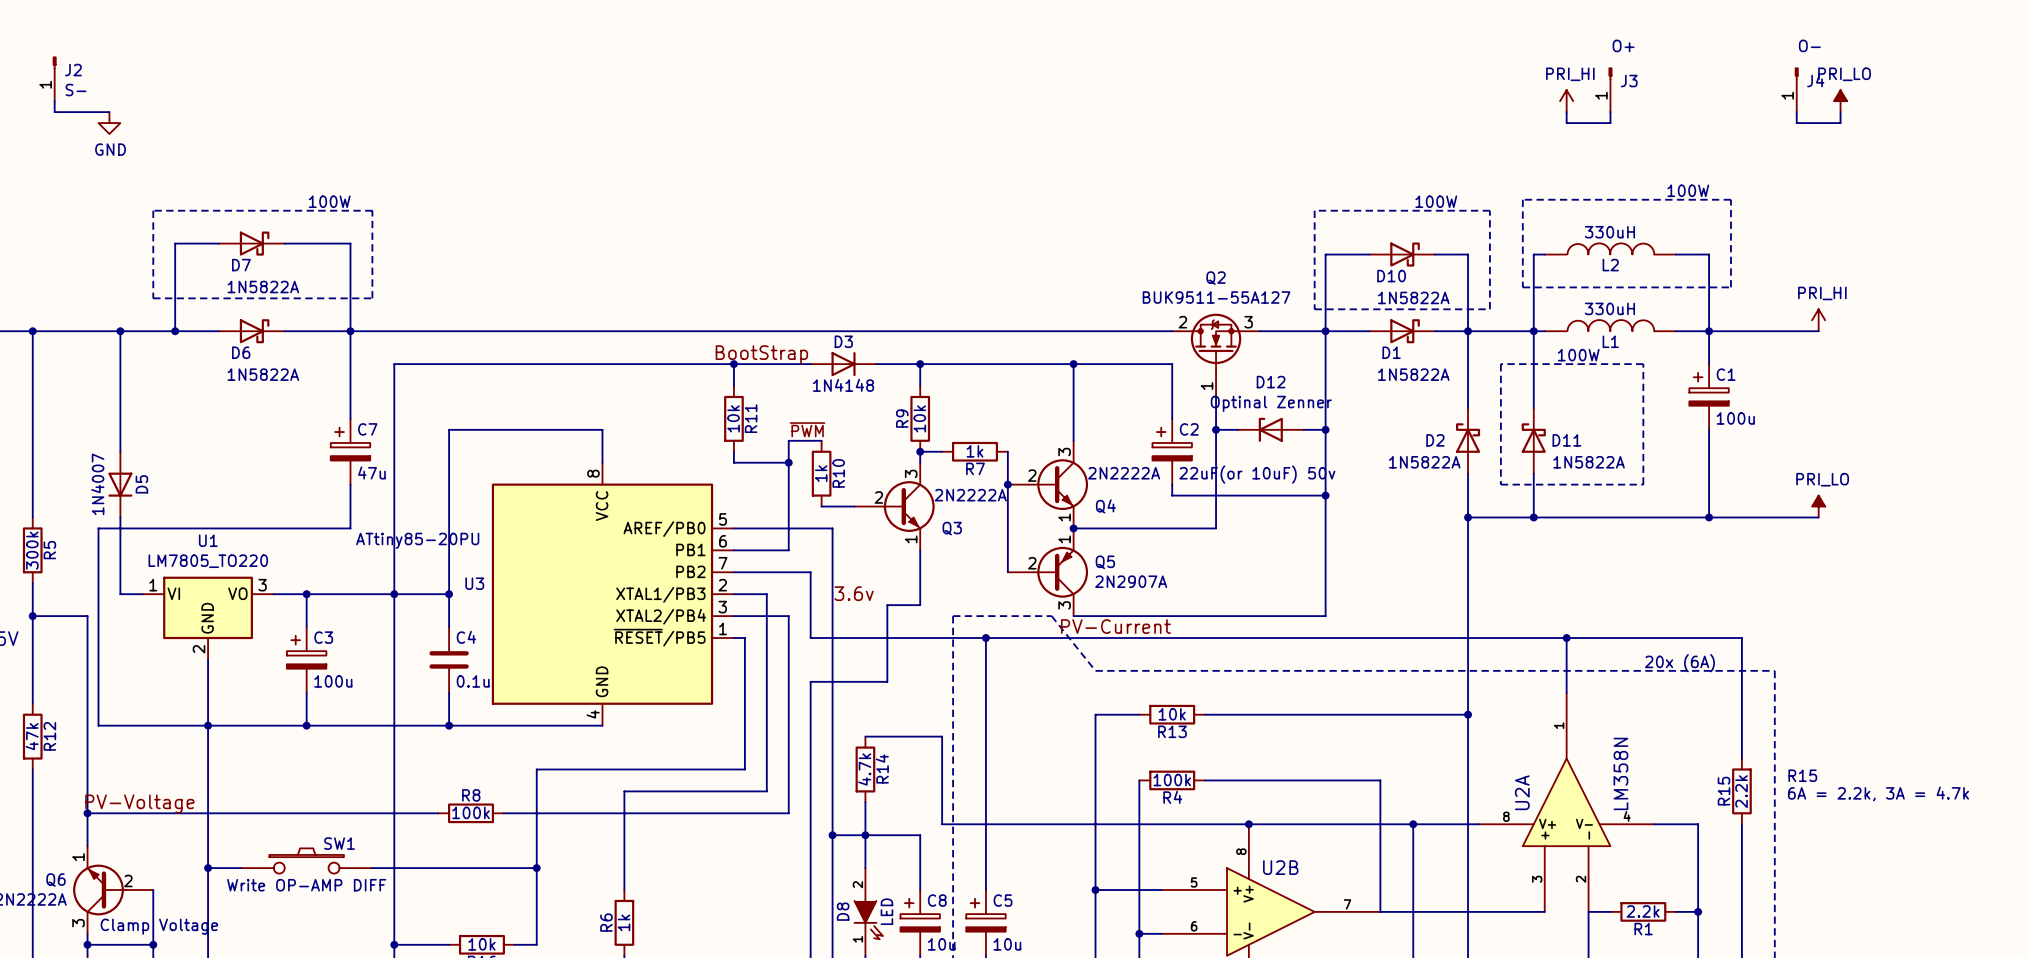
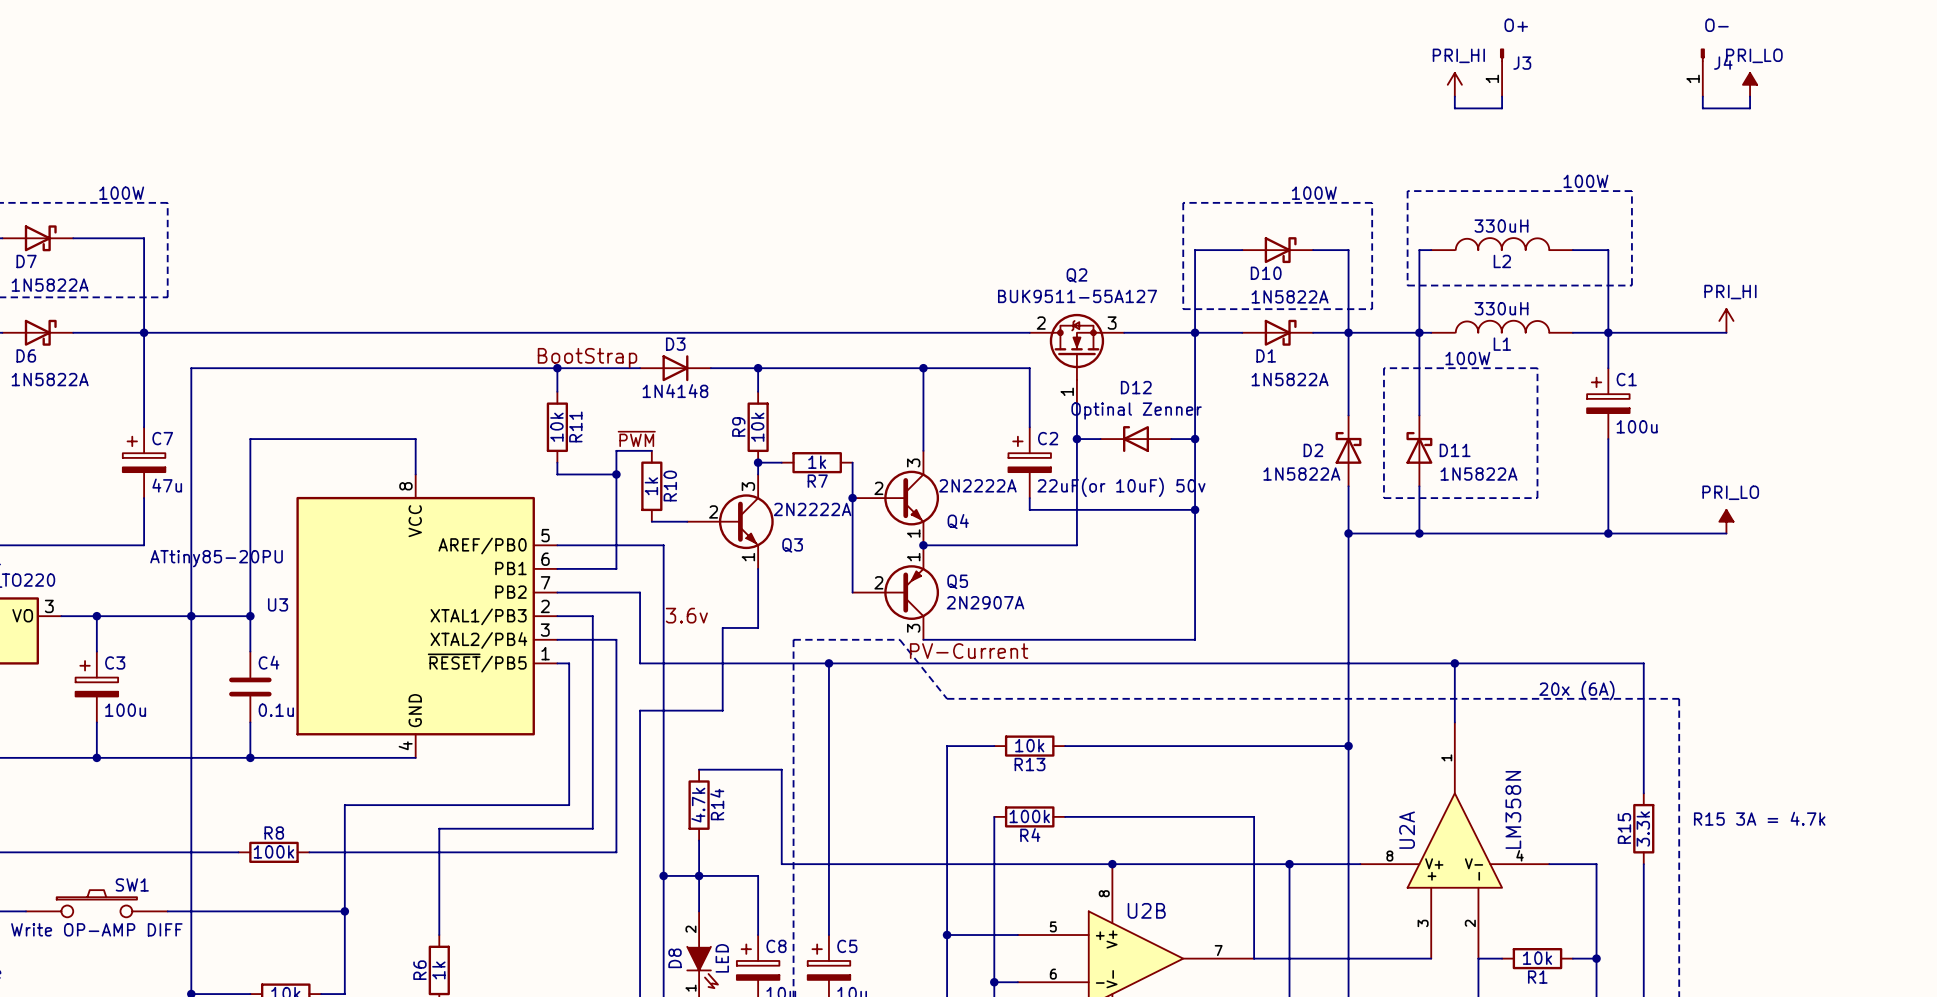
text: R15 (1802, 775) -> none
R15 value: 2.2k (1741, 791) -> 3.3k (1643, 829)
text: 6A = 2.2k, 3A = 4.7k (1878, 793) -> R15 3A = 4.7k (1759, 818)
R1 value: 2.2k (1643, 911) -> 10k (1537, 958)

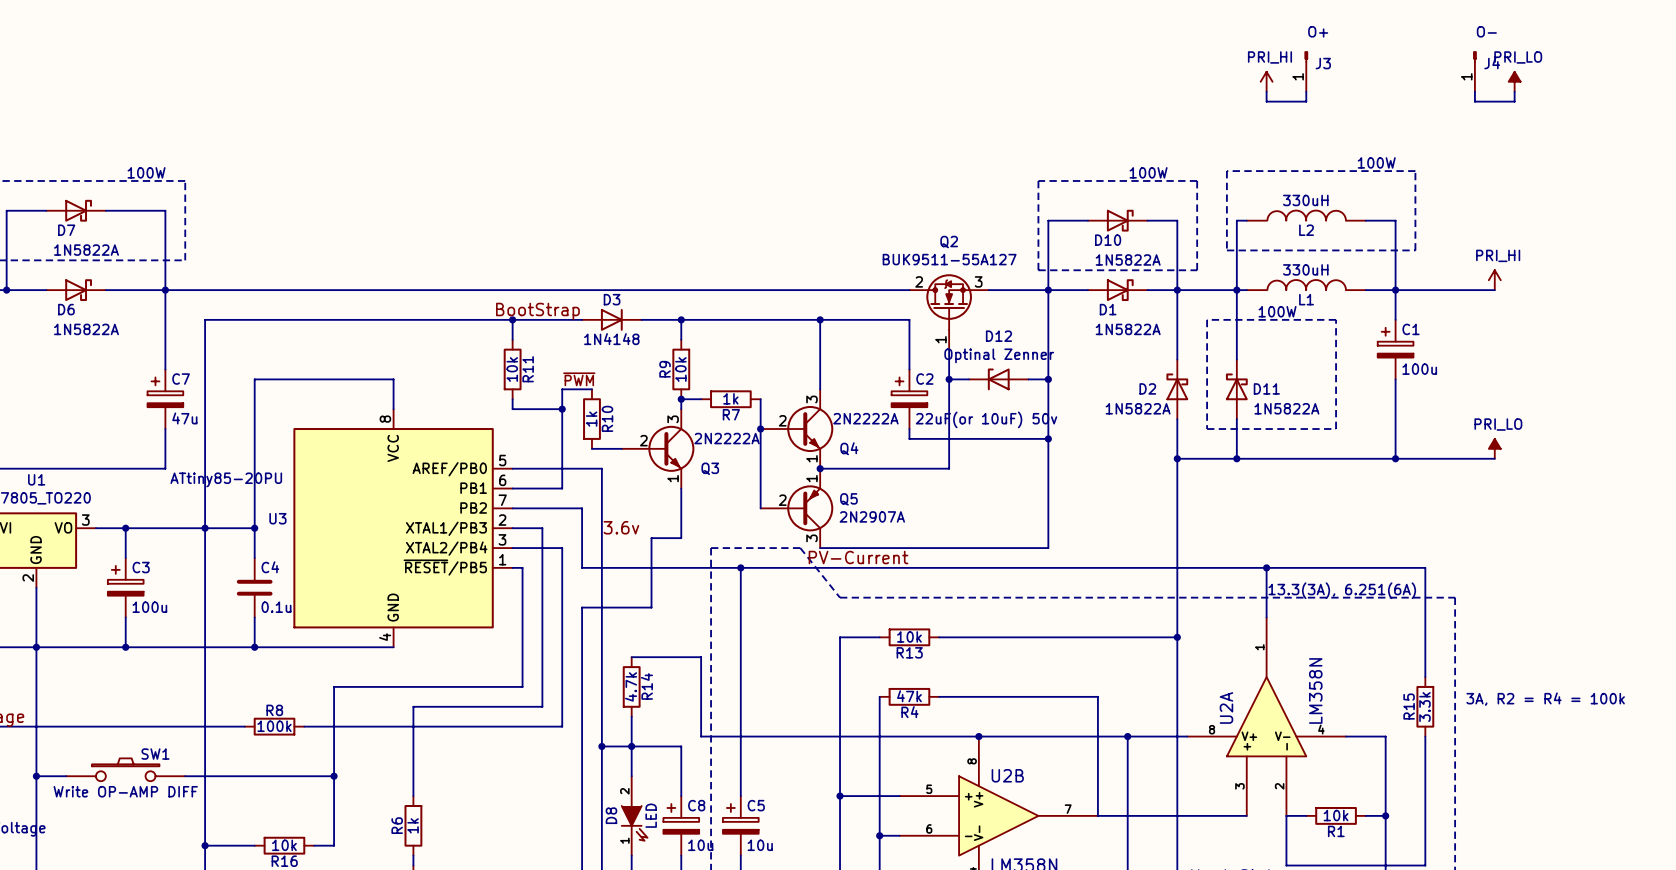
text: none -> 13.3(3A), 6.251(6A) (1342, 590)
text: 20x (6A) (1576, 690) -> none
R4 value: 100k (1029, 816) -> 47k (909, 696)
text: R15 3A = 4.7k (1759, 818) -> 3A, R2 = R4 = 100k (1545, 699)

